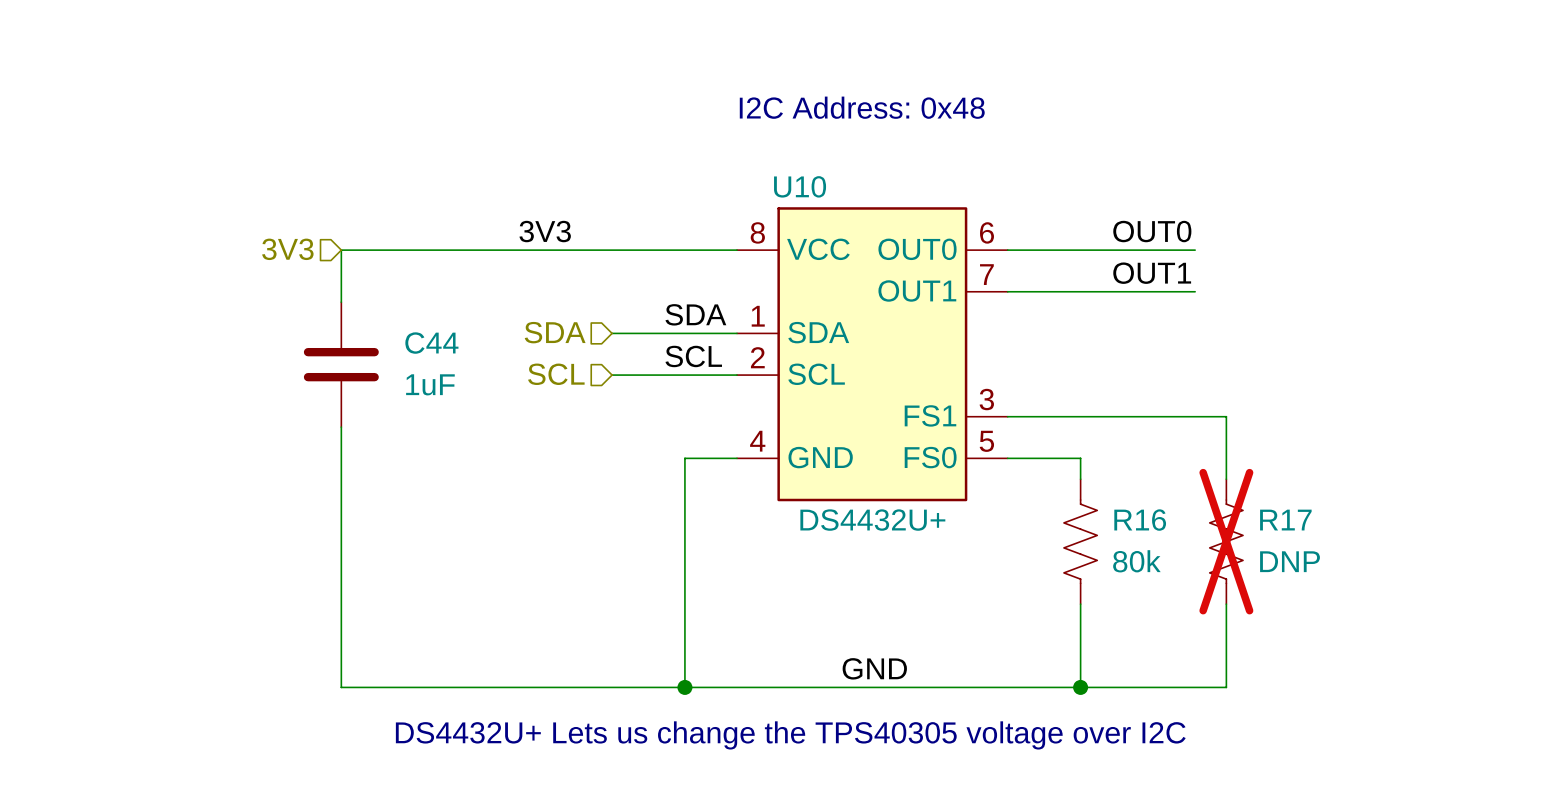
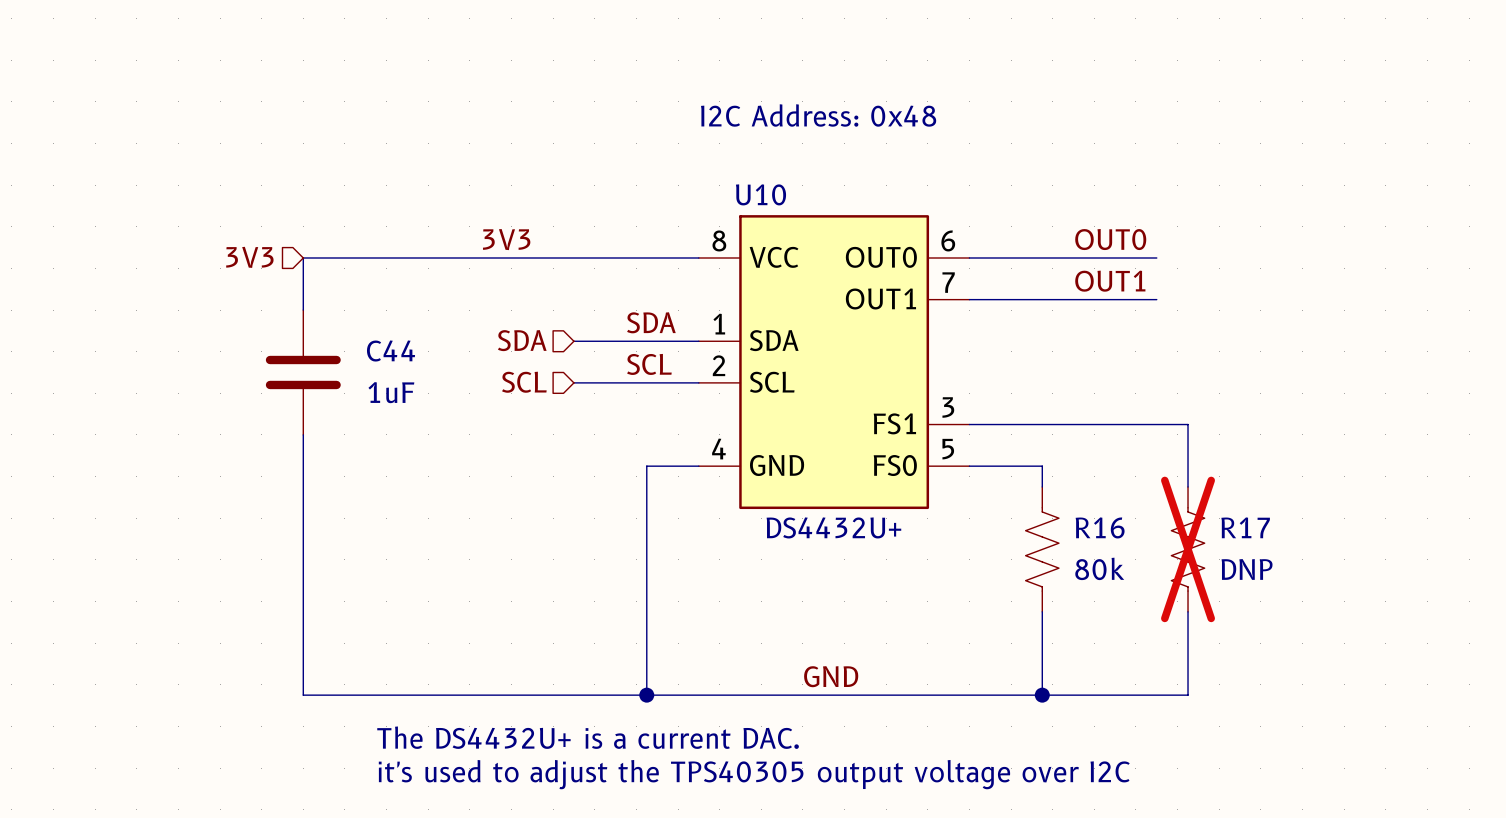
text: none -> The DS4432U+ is a current DAC. (588, 737)
text: DS4432U+ Lets us change the TPS40305 voltage over I2C (790, 735) -> it's used to adjust the TPS40305 output voltage over I2C (754, 774)

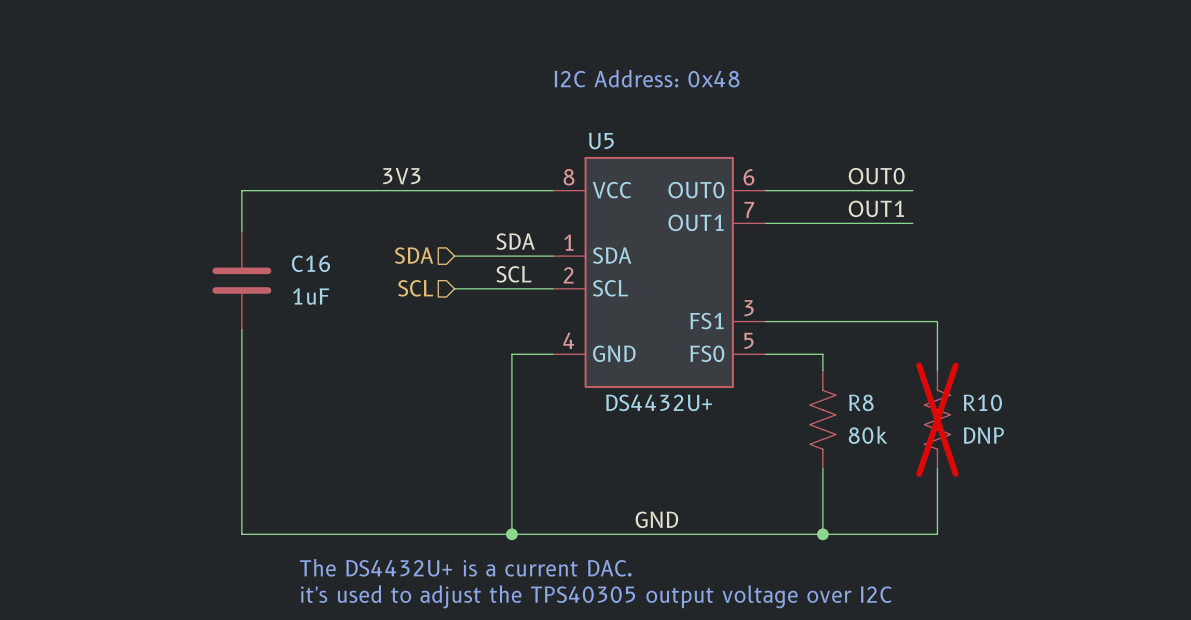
U10 name: U10 (760, 194) -> U5 (601, 141)
hierarchical label: 3V3 (249, 257) -> none
C44 name: C44 (391, 351) -> C16 (310, 263)
R16 name: R16 (1100, 527) -> R8 (861, 402)
R17 name: R17 (1245, 527) -> R10 (982, 402)

